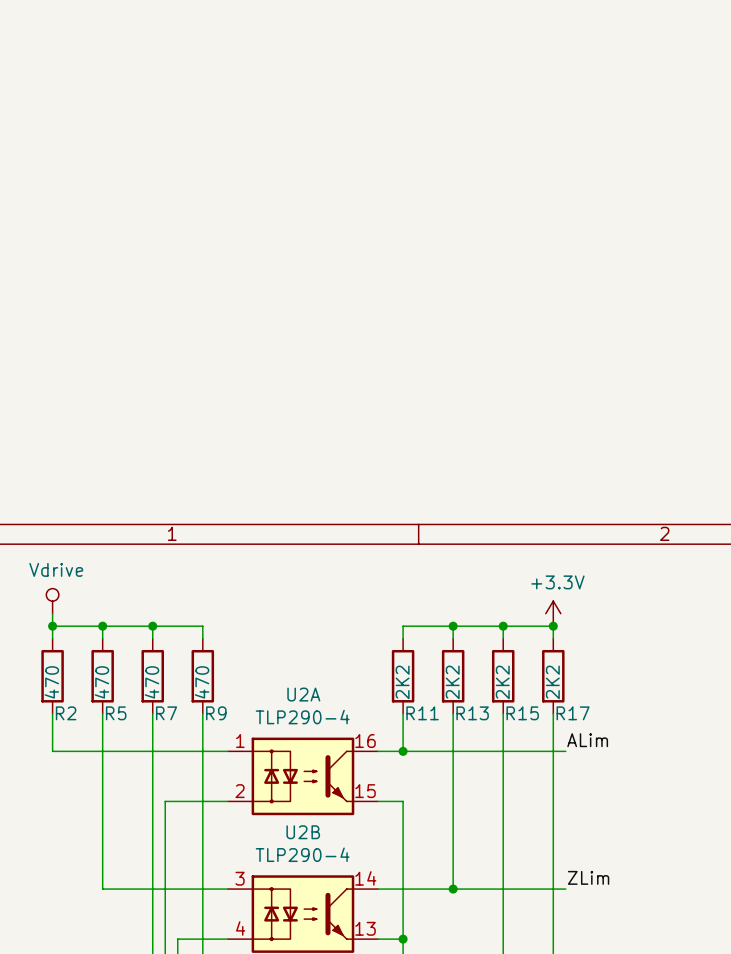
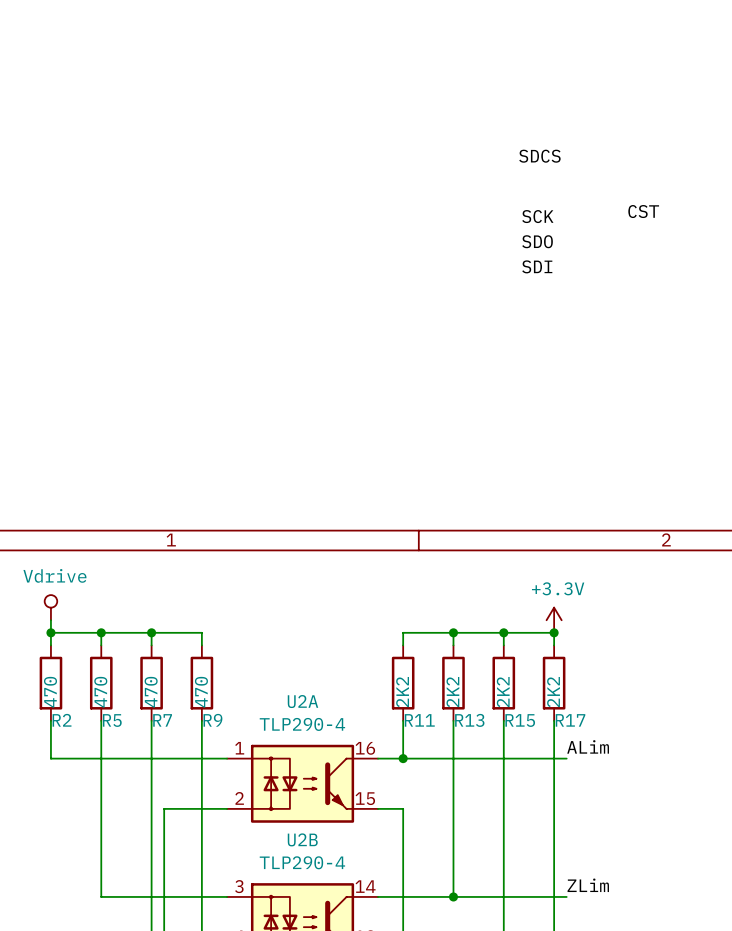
label: none -> SDCS (539, 156)
label: none -> CST (643, 211)
label: none -> SCK (537, 216)
label: none -> SDO (537, 241)
label: none -> SDI (537, 266)

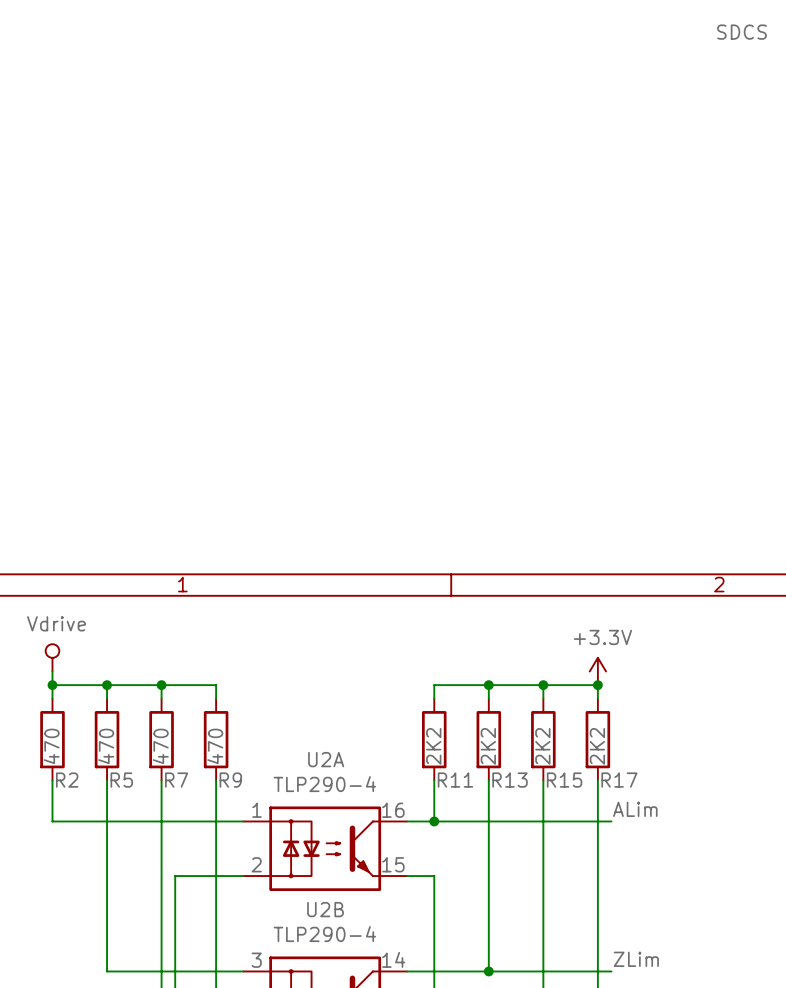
label position: SDCS (539, 156) -> SDCS (742, 32)
label: CST (643, 211) -> none
label: SCK (537, 216) -> none
label: SDO (537, 241) -> none
label: SDI (537, 266) -> none

